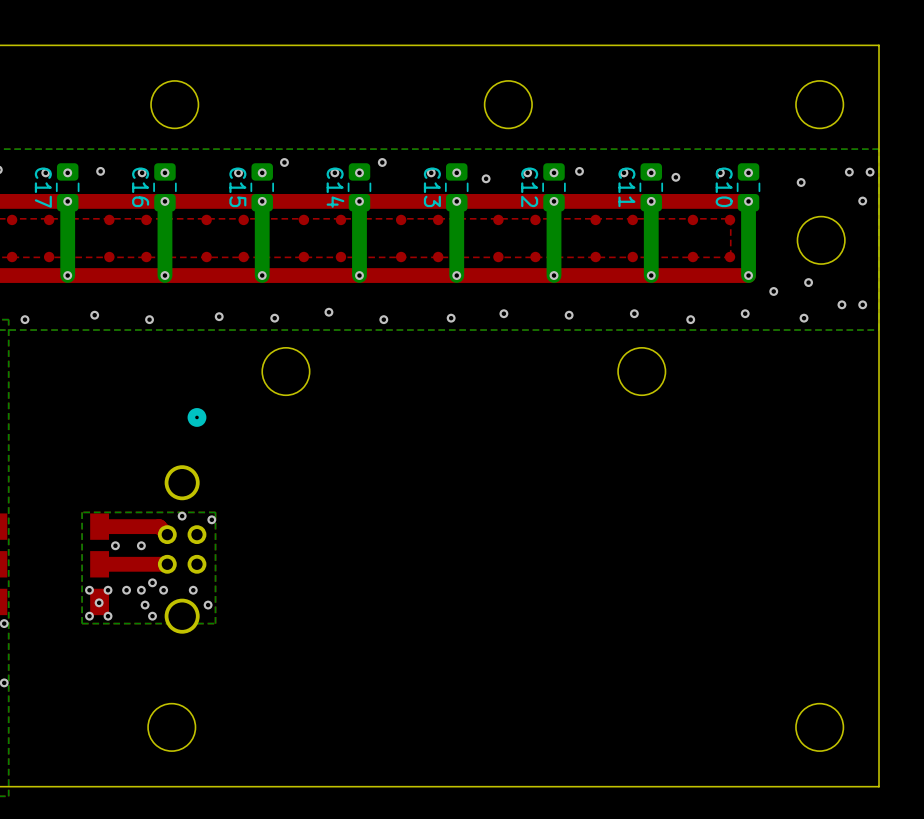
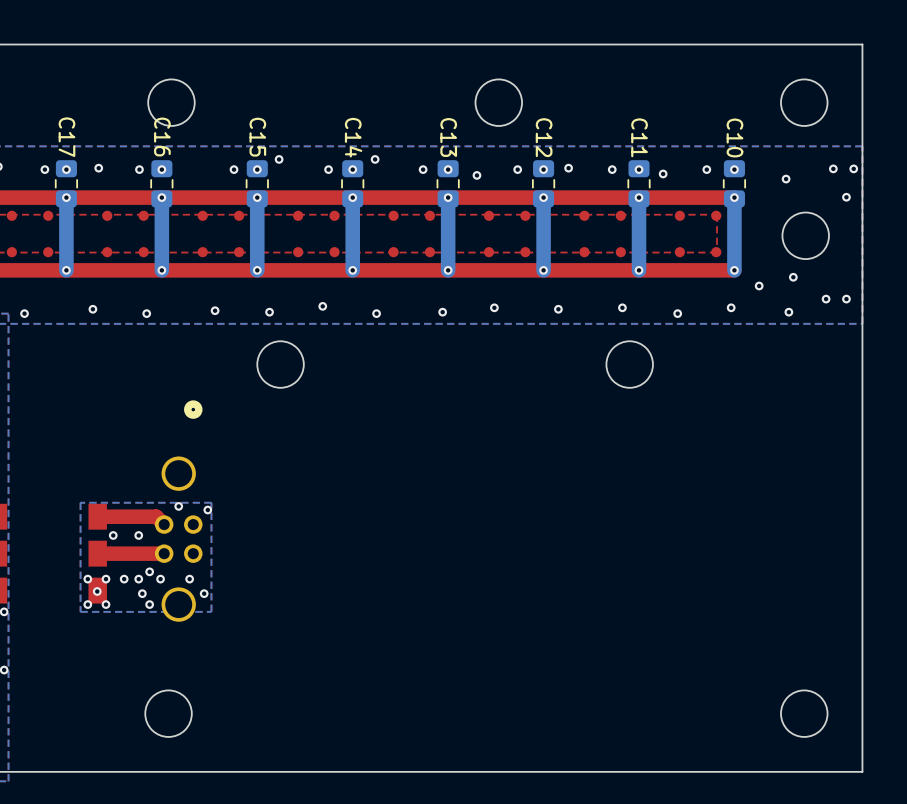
C17 name position: C17 (43, 187) -> C17 (66, 137)
C16 name position: C16 (140, 187) -> C16 (162, 137)
C15 name position: C15 (237, 187) -> C15 (257, 137)
C14 name position: C14 (335, 187) -> C14 (353, 137)
C13 name position: C13 (432, 187) -> C13 (448, 137)
C12 name position: C12 (529, 187) -> C12 (544, 137)
C11 name position: C11 (626, 187) -> C11 (639, 137)
C10 name position: C10 (724, 187) -> C10 (734, 137)

